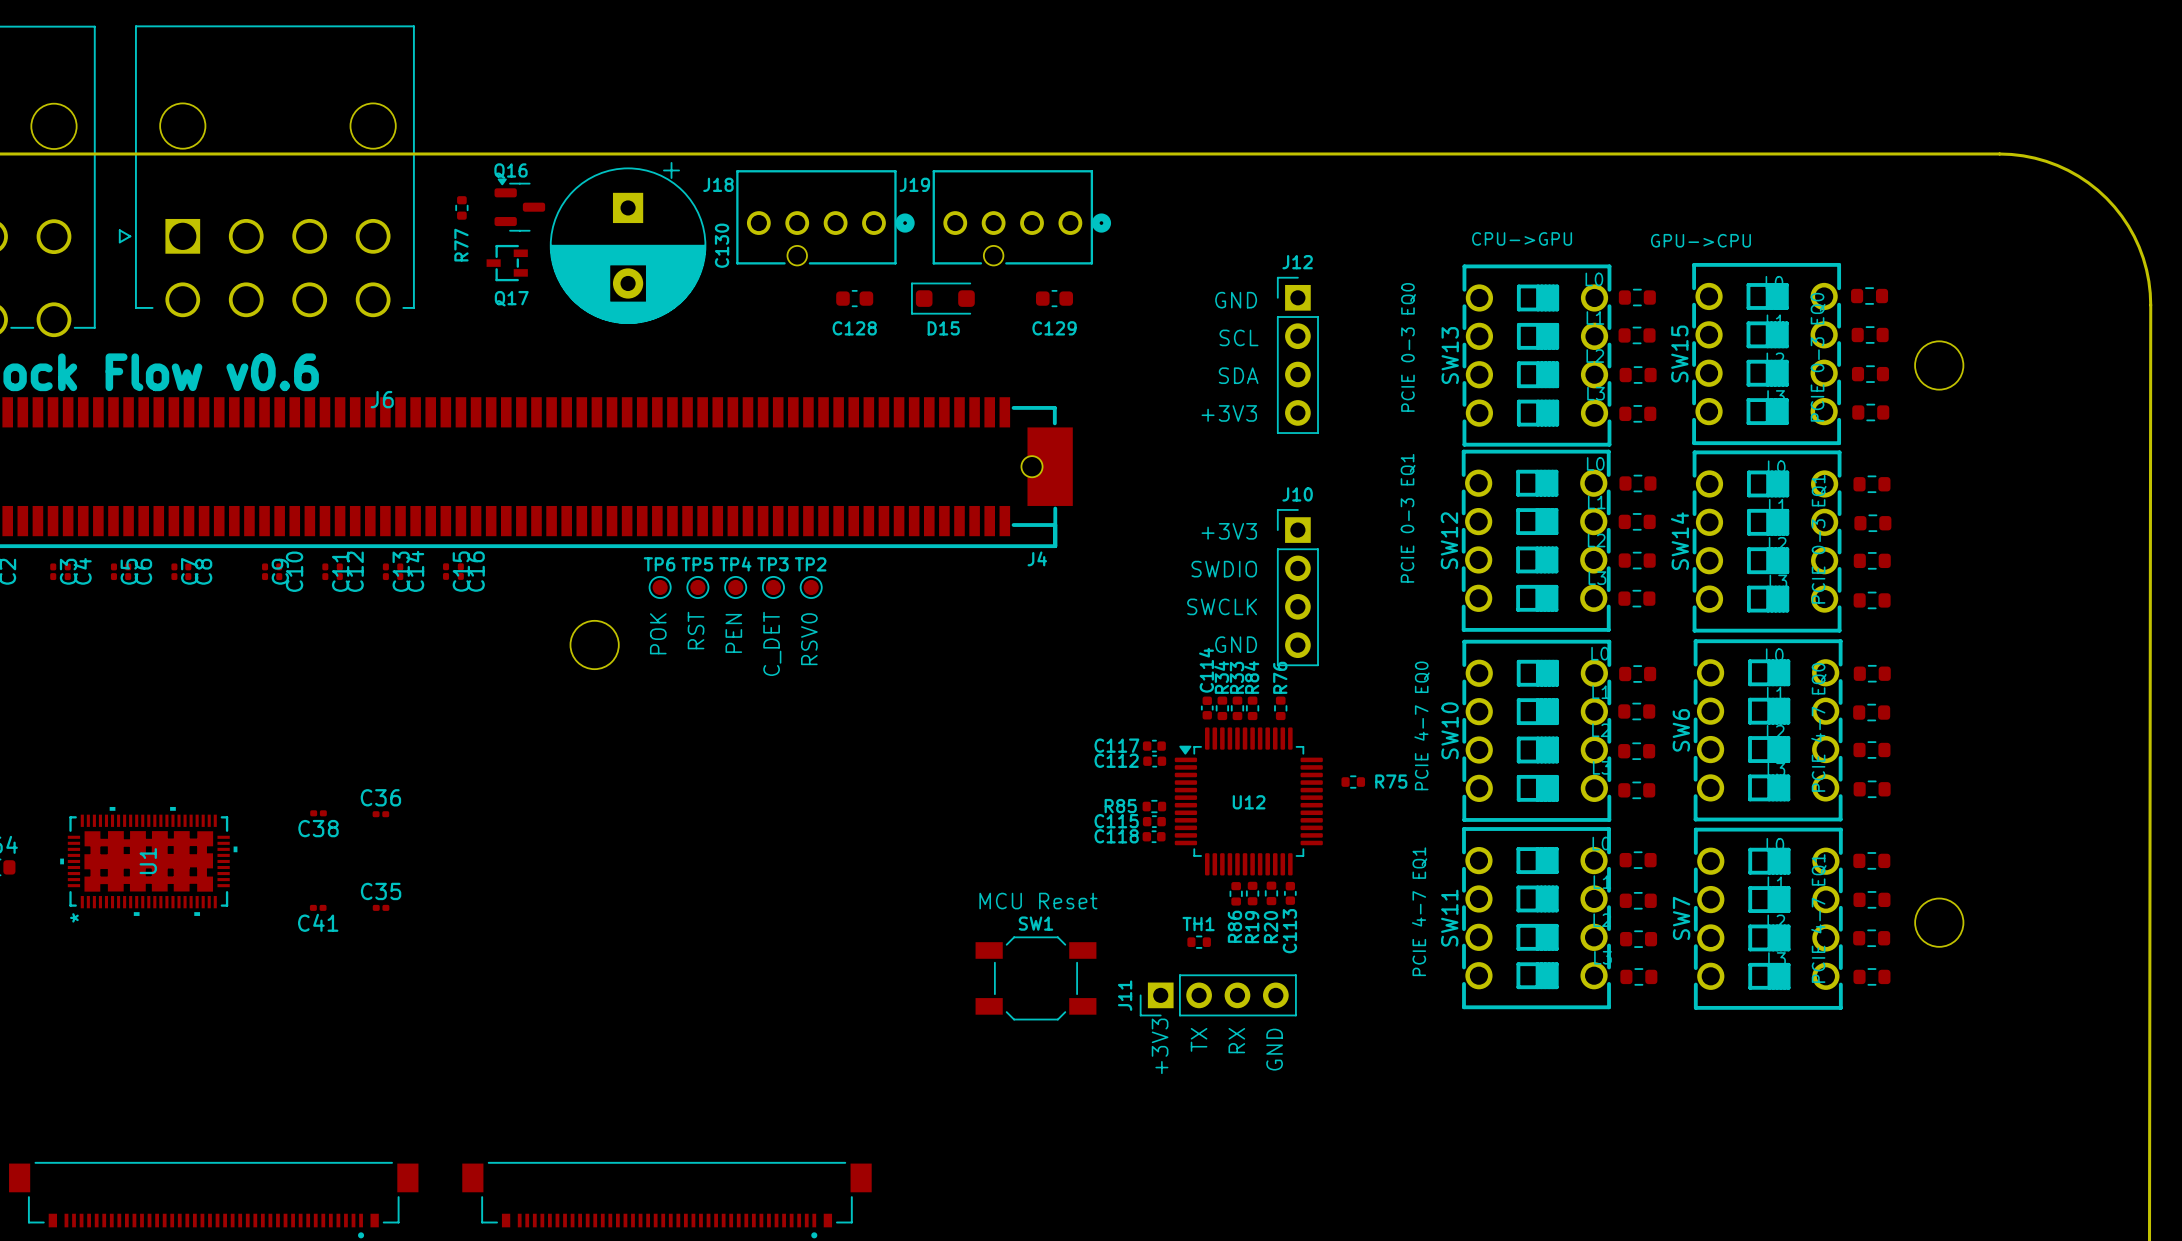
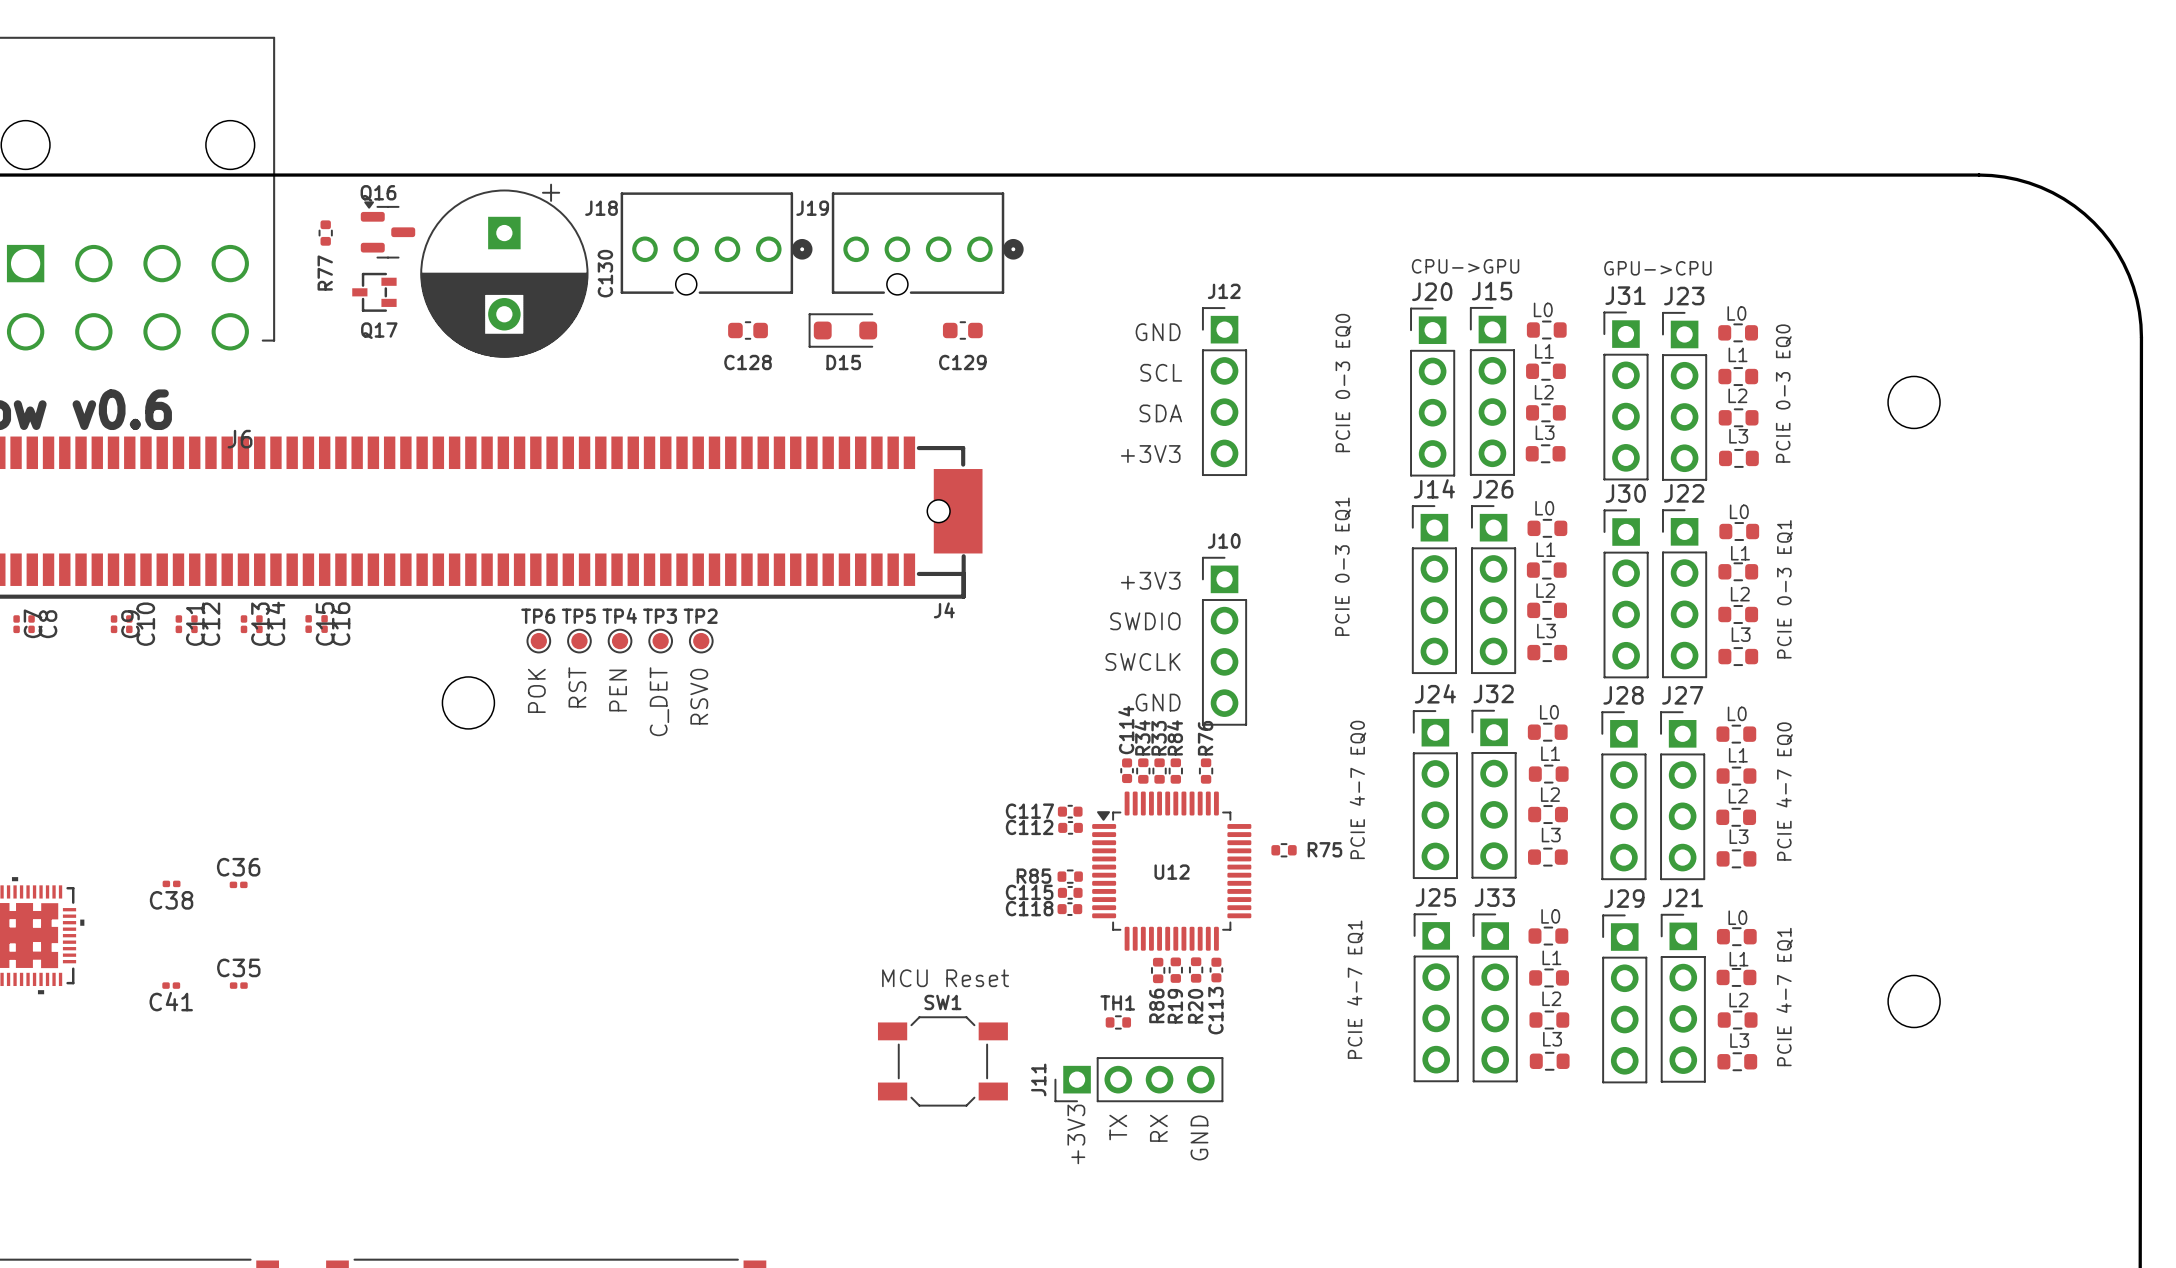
part: (1869, 296) -> none
part: (1637, 297) -> none
part: none -> (1546, 330)
part: none -> (1738, 332)
part: (1870, 334) -> none
part: (1637, 335) -> none
part: none -> (1545, 371)
part: none -> (1738, 376)
SW15: (1766, 354) -> none
J20: none -> (1432, 392)
SW13: (1536, 355) -> none
J15: none -> (1492, 391)
J31: none -> (1625, 395)
J23: none -> (1684, 396)
part: (1870, 374) -> none
part: none -> (1545, 412)
part: (1638, 375) -> none
part: none -> (1738, 417)
part: (1870, 412) -> none
part: none -> (1545, 453)
part: (1637, 413) -> none
part: none -> (1738, 458)
part: none -> (1547, 528)
part: (1637, 483) -> none
part: (1871, 484) -> none
part: none -> (1739, 531)
part: none -> (1546, 570)
part: (1637, 521) -> none
part: none -> (1738, 571)
part: (1872, 523) -> none
J14: none -> (1434, 589)
J26: none -> (1493, 589)
SW12: (1536, 540) -> none
SW14: (1767, 541) -> none
J30: none -> (1626, 593)
J22: none -> (1684, 593)
part: none -> (1547, 610)
part: (1637, 560) -> none
part: (1872, 560) -> none
part: none -> (1738, 614)
part: none -> (1547, 652)
part: (1636, 598) -> none
part: (1872, 600) -> none
part: none -> (1738, 656)
part: none -> (1547, 732)
part: (1872, 673) -> none
part: (1637, 674) -> none
part: none -> (1736, 734)
part: none -> (1548, 774)
part: (1636, 711) -> none
part: none -> (1736, 776)
part: (1871, 712) -> none
J32: none -> (1494, 794)
J24: none -> (1435, 794)
SW10: (1536, 730) -> none
SW6: (1768, 730) -> none
J28: none -> (1623, 795)
J27: none -> (1682, 795)
part: none -> (1548, 814)
part: (1871, 750) -> none
part: (1636, 751) -> none
part: none -> (1736, 817)
part: none -> (1547, 857)
part: (1872, 789) -> none
part: (1636, 790) -> none
part: none -> (1736, 858)
part: (1638, 860) -> none
part: (1871, 860) -> none
part: none -> (1548, 936)
part: none -> (1736, 936)
part: (1871, 899) -> none
part: none -> (1549, 977)
part: (1638, 900) -> none
part: none -> (1736, 977)
SW11: (1536, 918) -> none
SW7: (1768, 918) -> none
J25: none -> (1436, 997)
J33: none -> (1495, 997)
J21: none -> (1683, 998)
J29: none -> (1624, 998)
part: (1871, 938) -> none
part: none -> (1549, 1020)
part: (1638, 939) -> none
part: none -> (1737, 1020)
part: (1638, 976) -> none
part: (1871, 976) -> none
part: none -> (1549, 1061)
part: none -> (1737, 1061)

